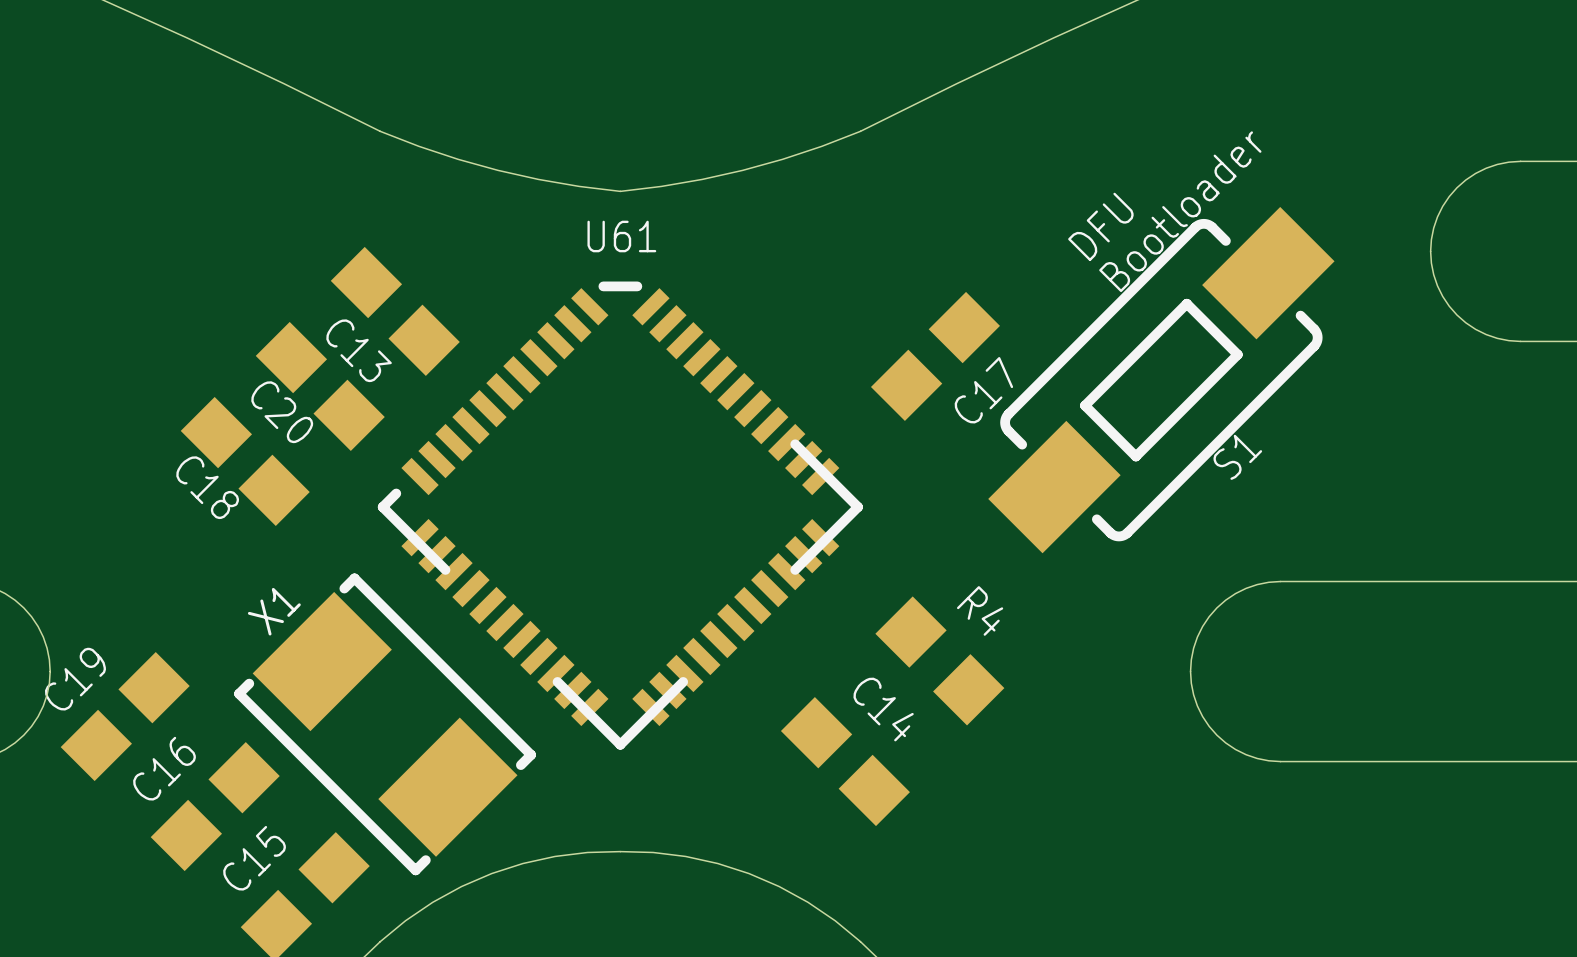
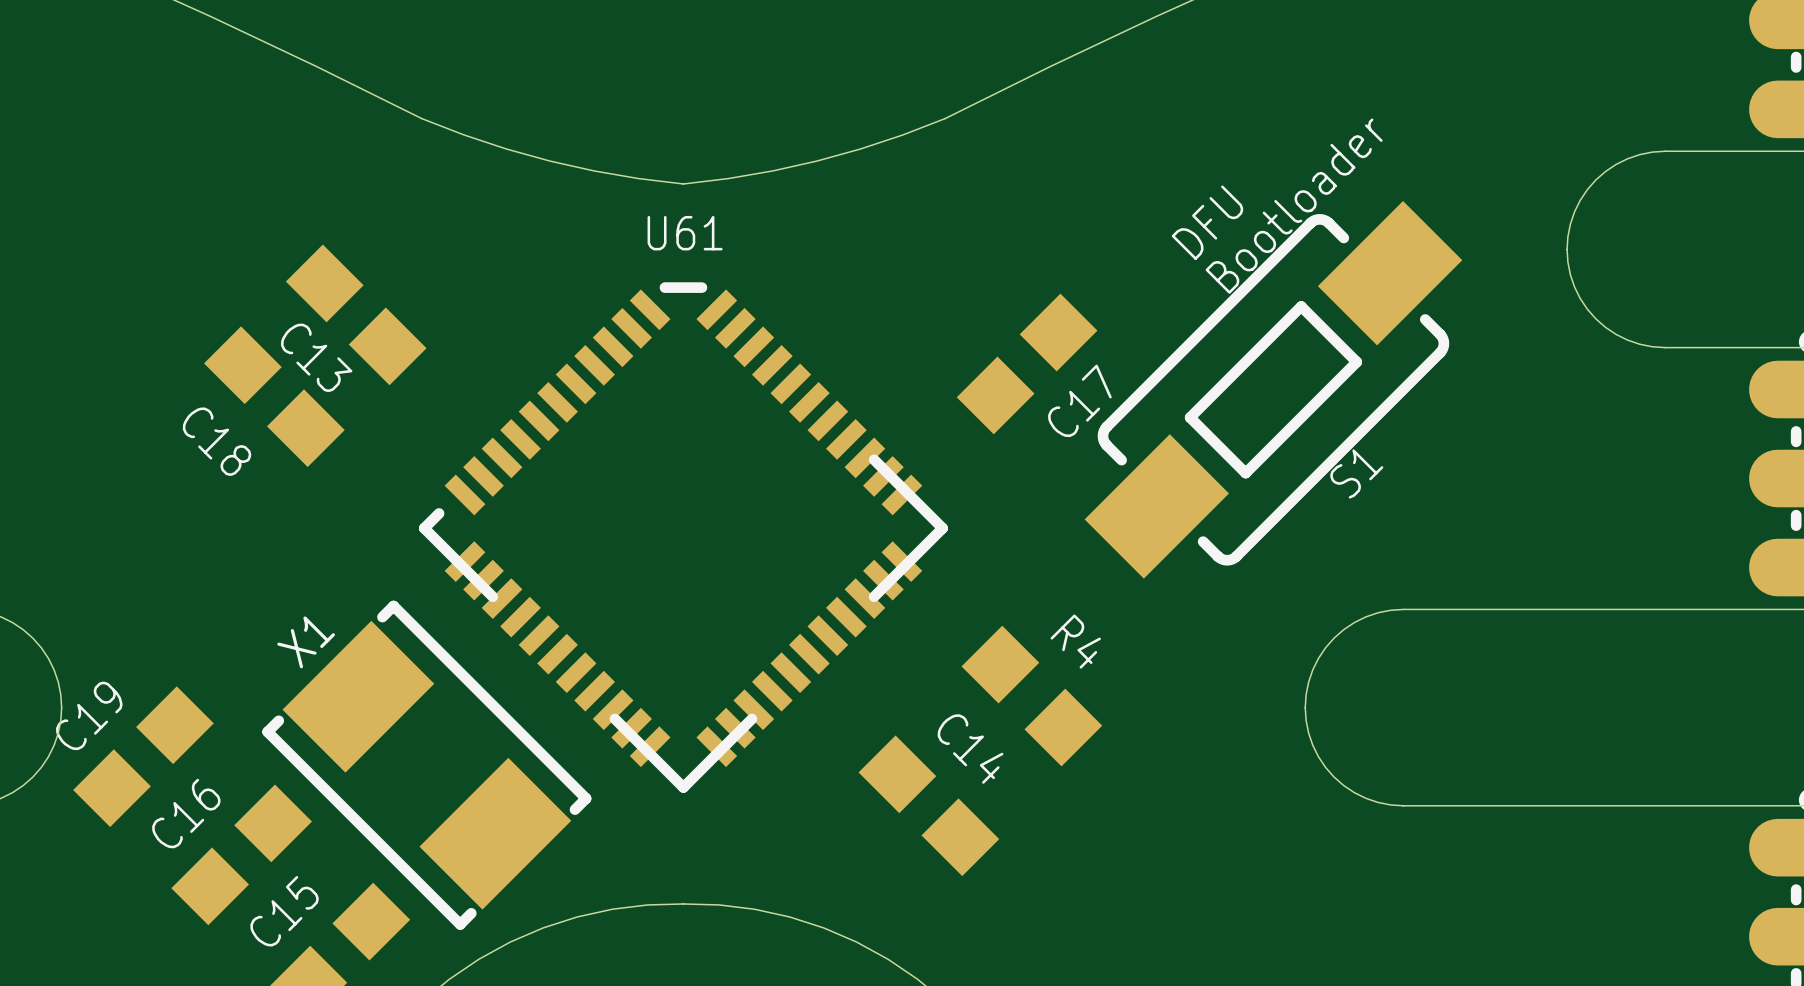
C13 position: (395, 311) -> (356, 314)
C20: (320, 386) -> none
C18 position: (245, 461) -> (274, 396)
C18 name position: C18 (207, 487) -> C18 (217, 441)

